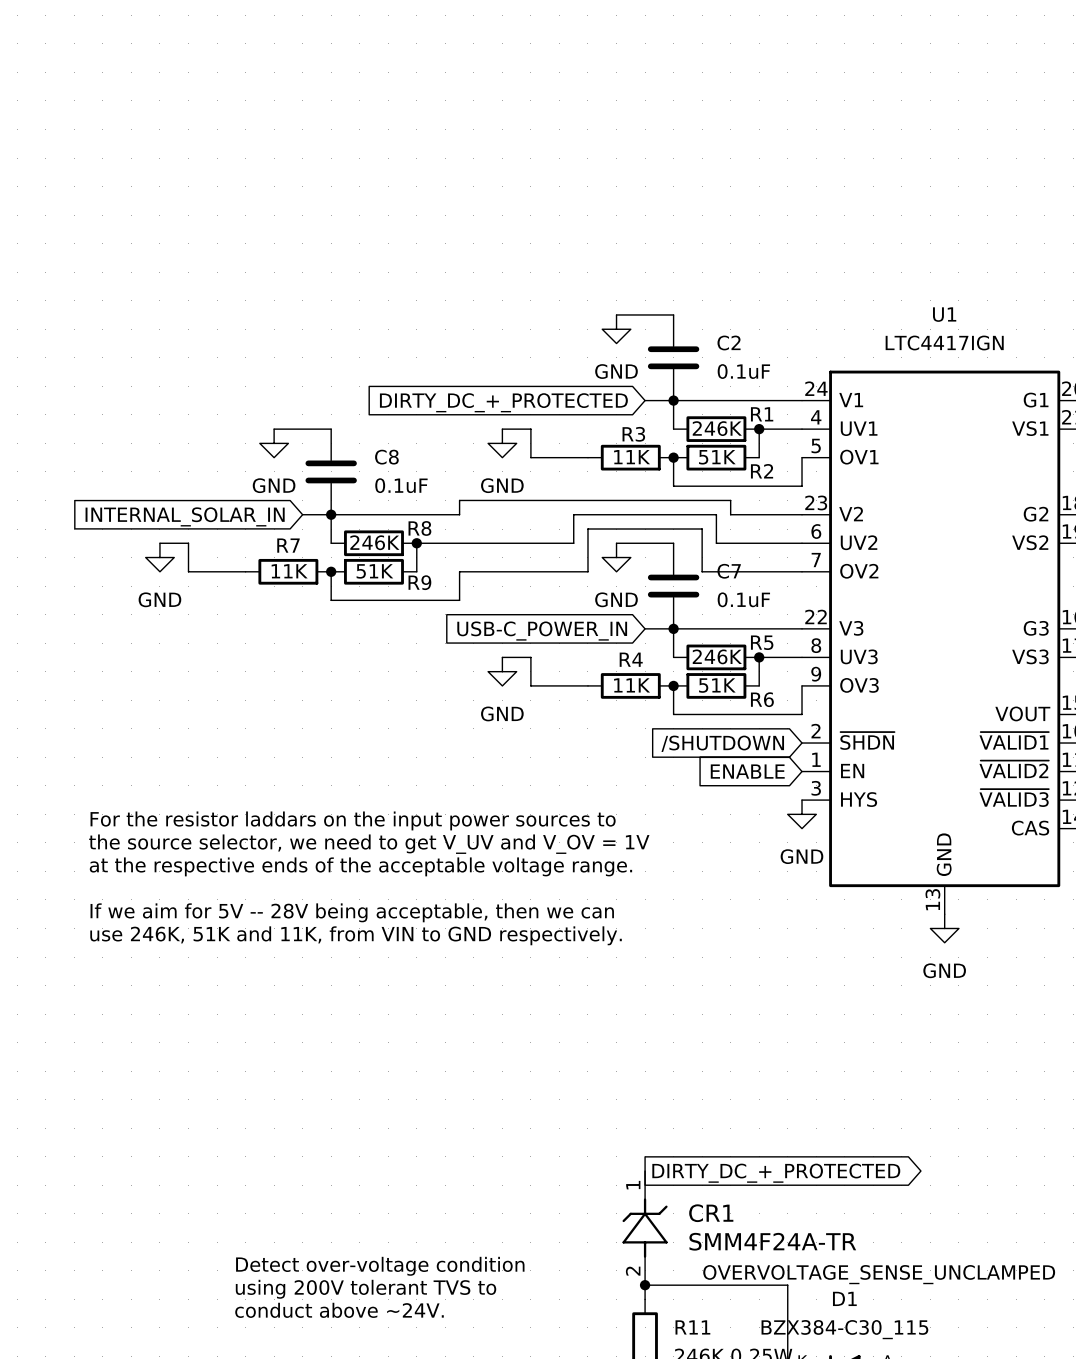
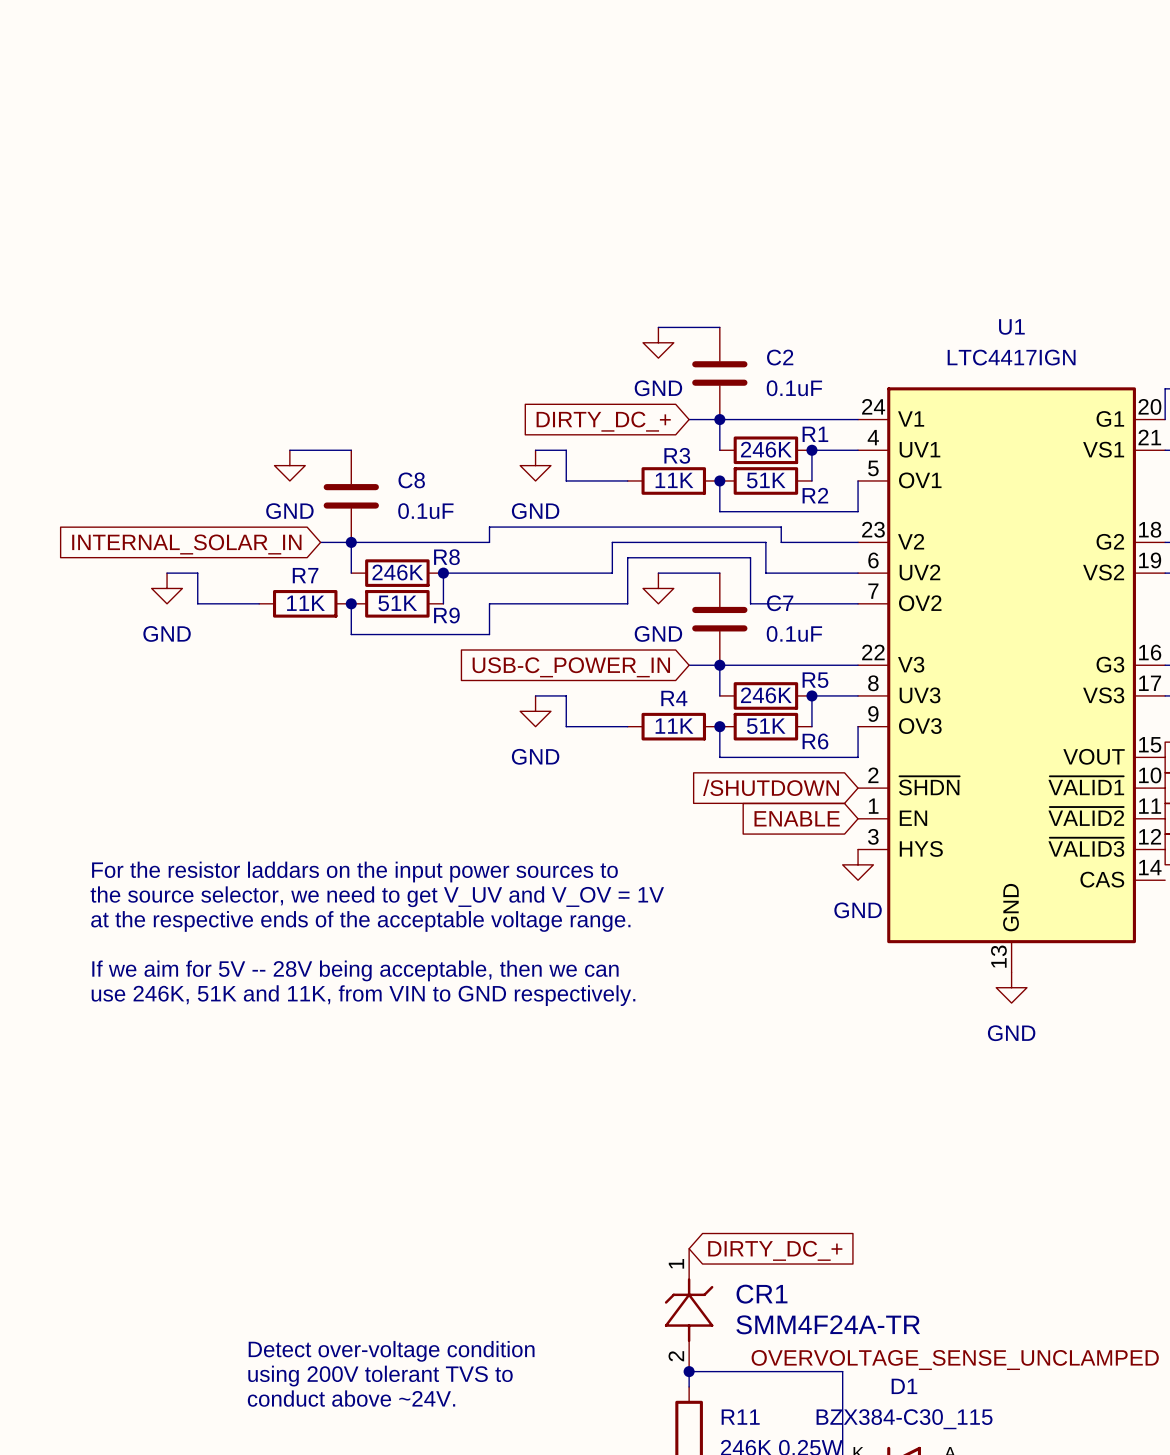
global label: DIRTY_DC_+_PROTECTED (503, 402) -> DIRTY_DC_+ (603, 421)
global label shape: output (776, 1173) -> input (775, 1250)
global label: DIRTY_DC_+_PROTECTED (776, 1173) -> DIRTY_DC_+ (775, 1250)

